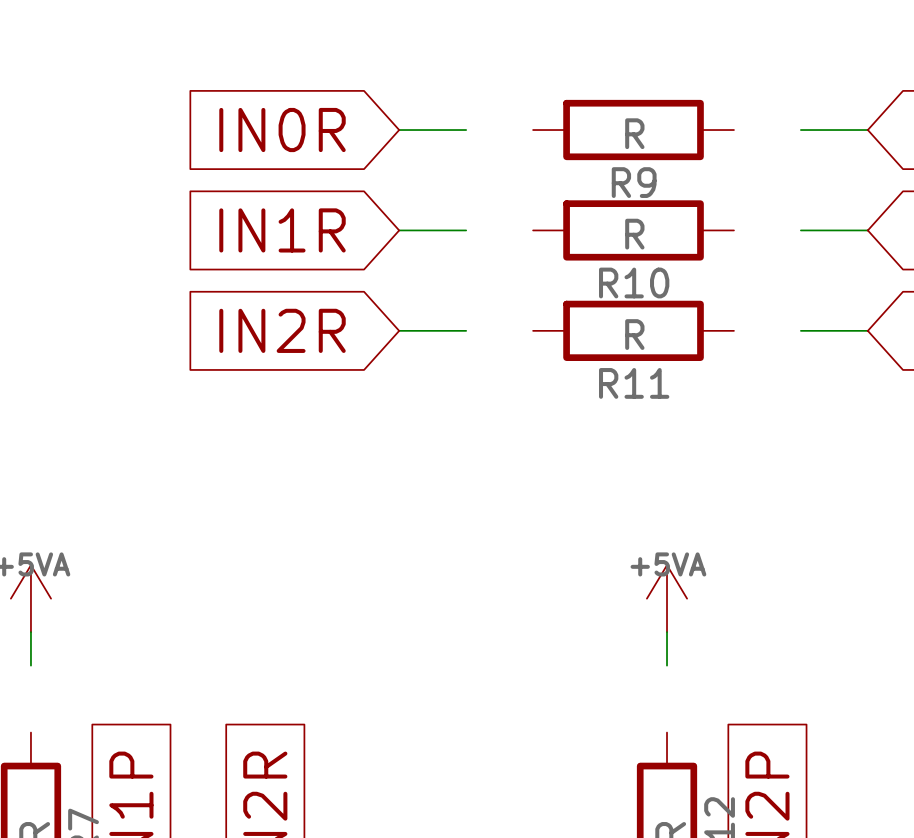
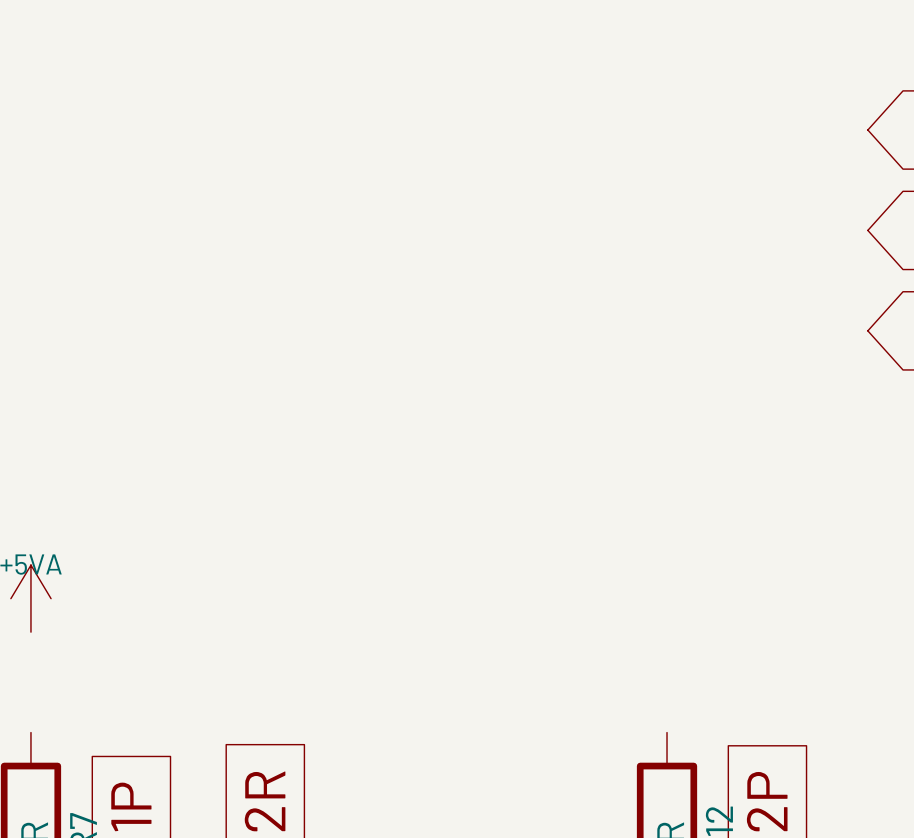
global label: IN0R (282, 130) -> none
wire: (399, 130) (466, 130) -> none
R9: R (633, 130) -> none
wire: (800, 130) (867, 130) -> none
global label: IN1R (282, 230) -> none
wire: (399, 230) (466, 230) -> none
R10: R (633, 230) -> none
wire: (800, 230) (867, 230) -> none
global label: IN2R (282, 330) -> none
wire: (399, 330) (466, 330) -> none
R11: R (633, 330) -> none
wire: (800, 330) (867, 330) -> none
power symbol: +5VA (667, 598) -> none
wire: (30, 632) (30, 665) -> none
wire: (667, 632) (667, 665) -> none

